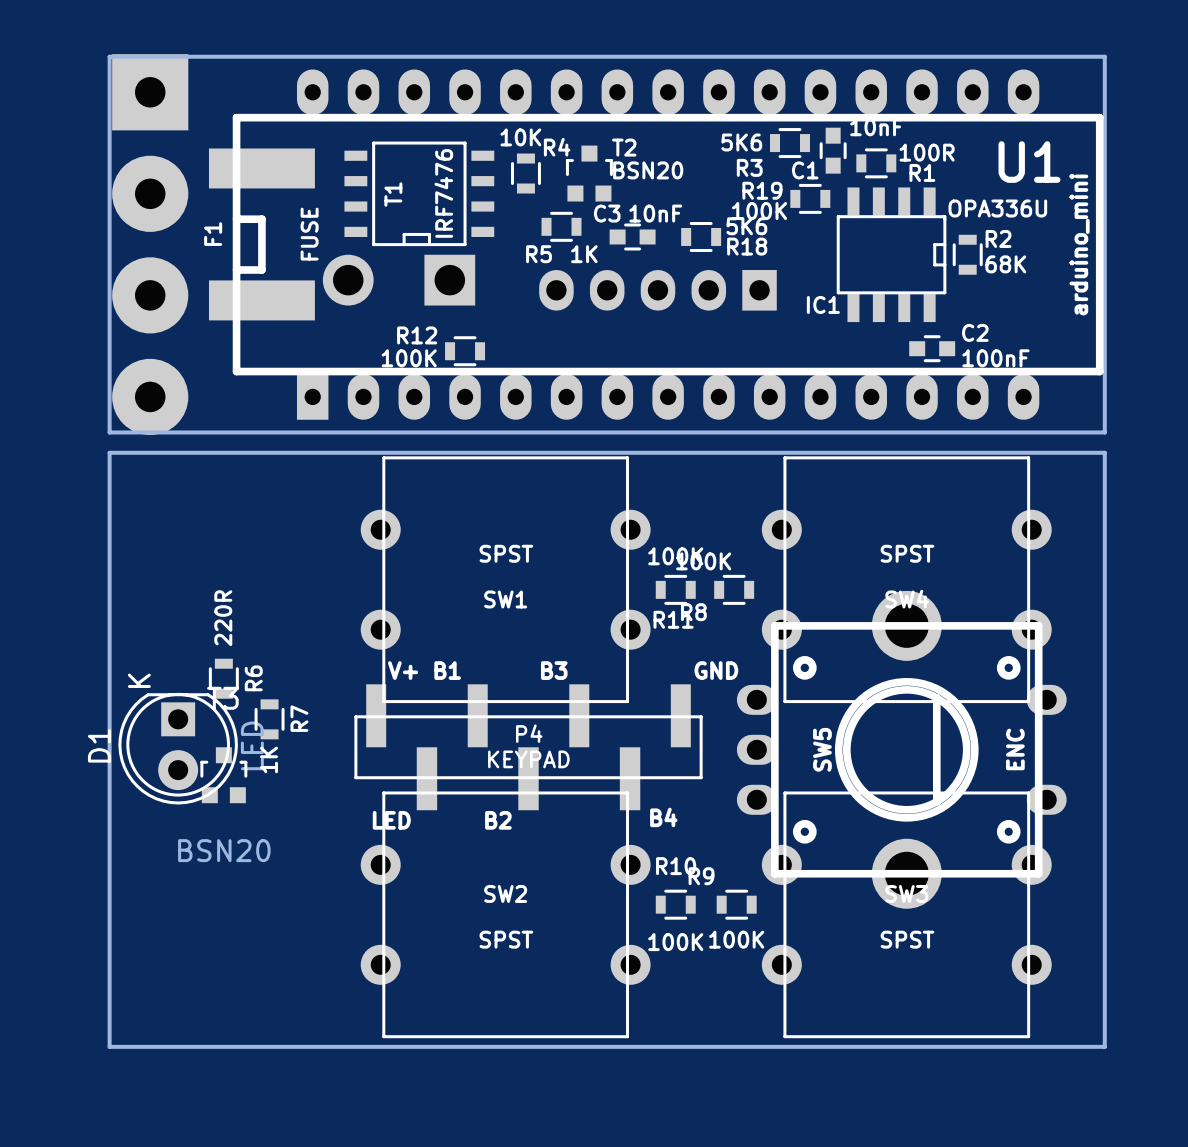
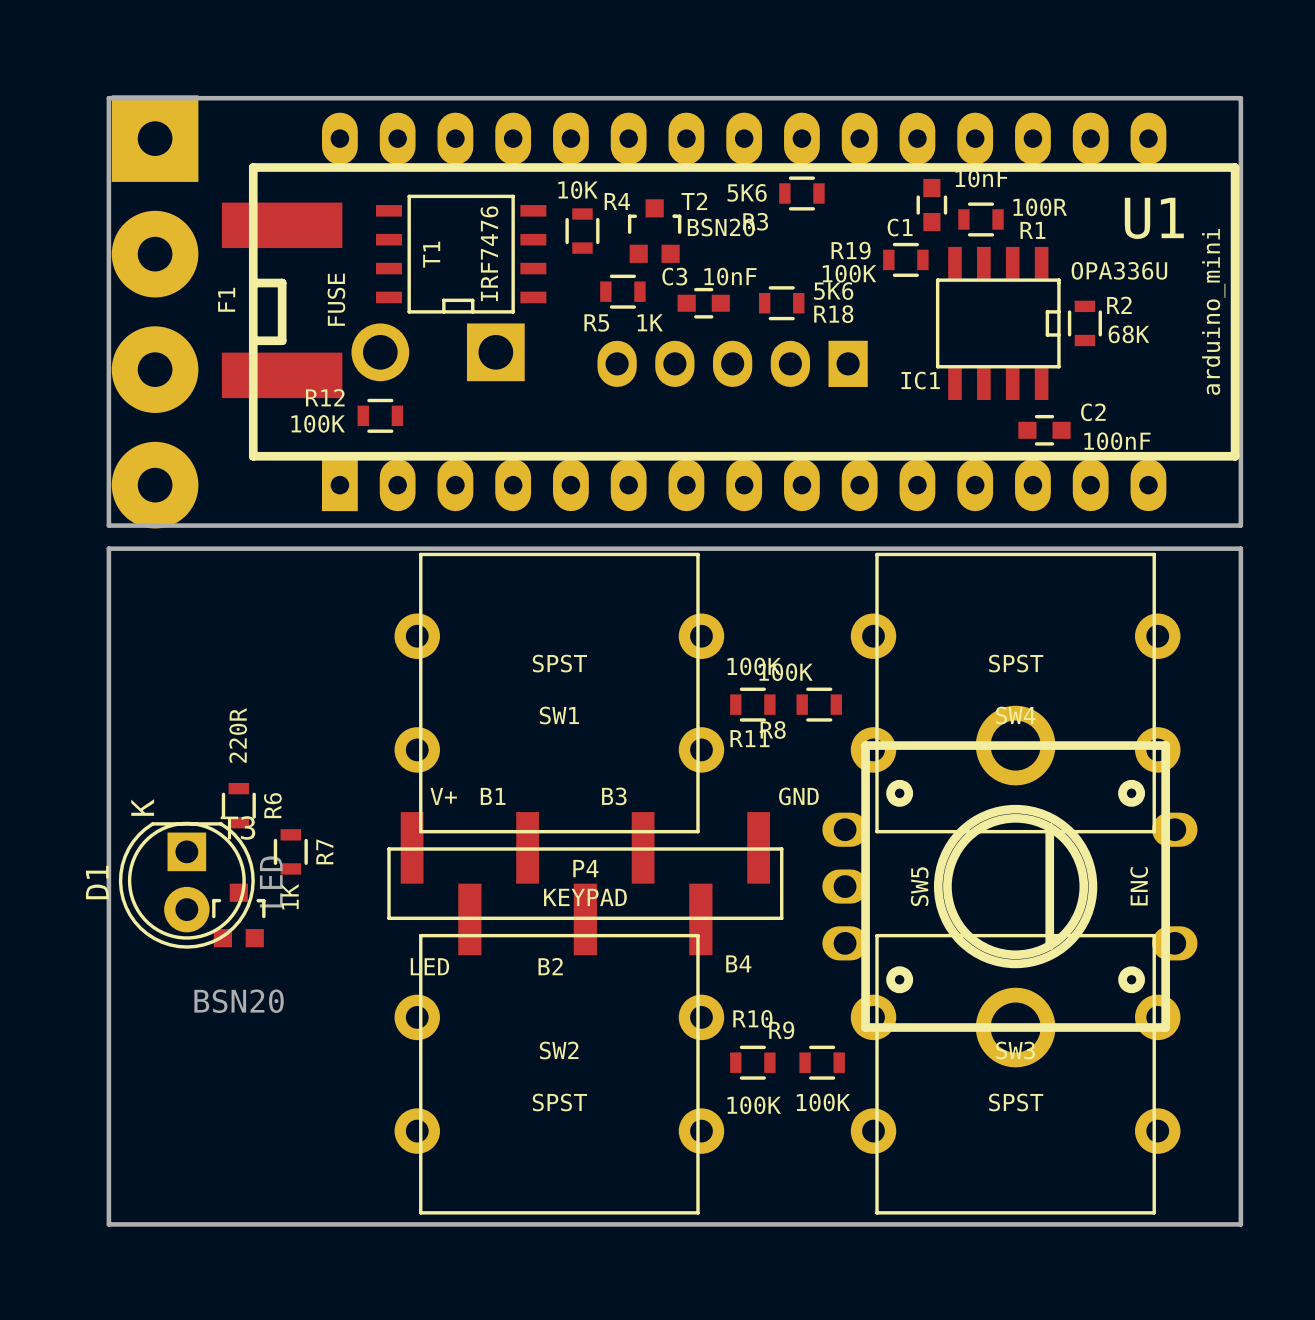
R3 position: (790, 143) -> (801, 193)
R12 position: (465, 351) -> (380, 415)

